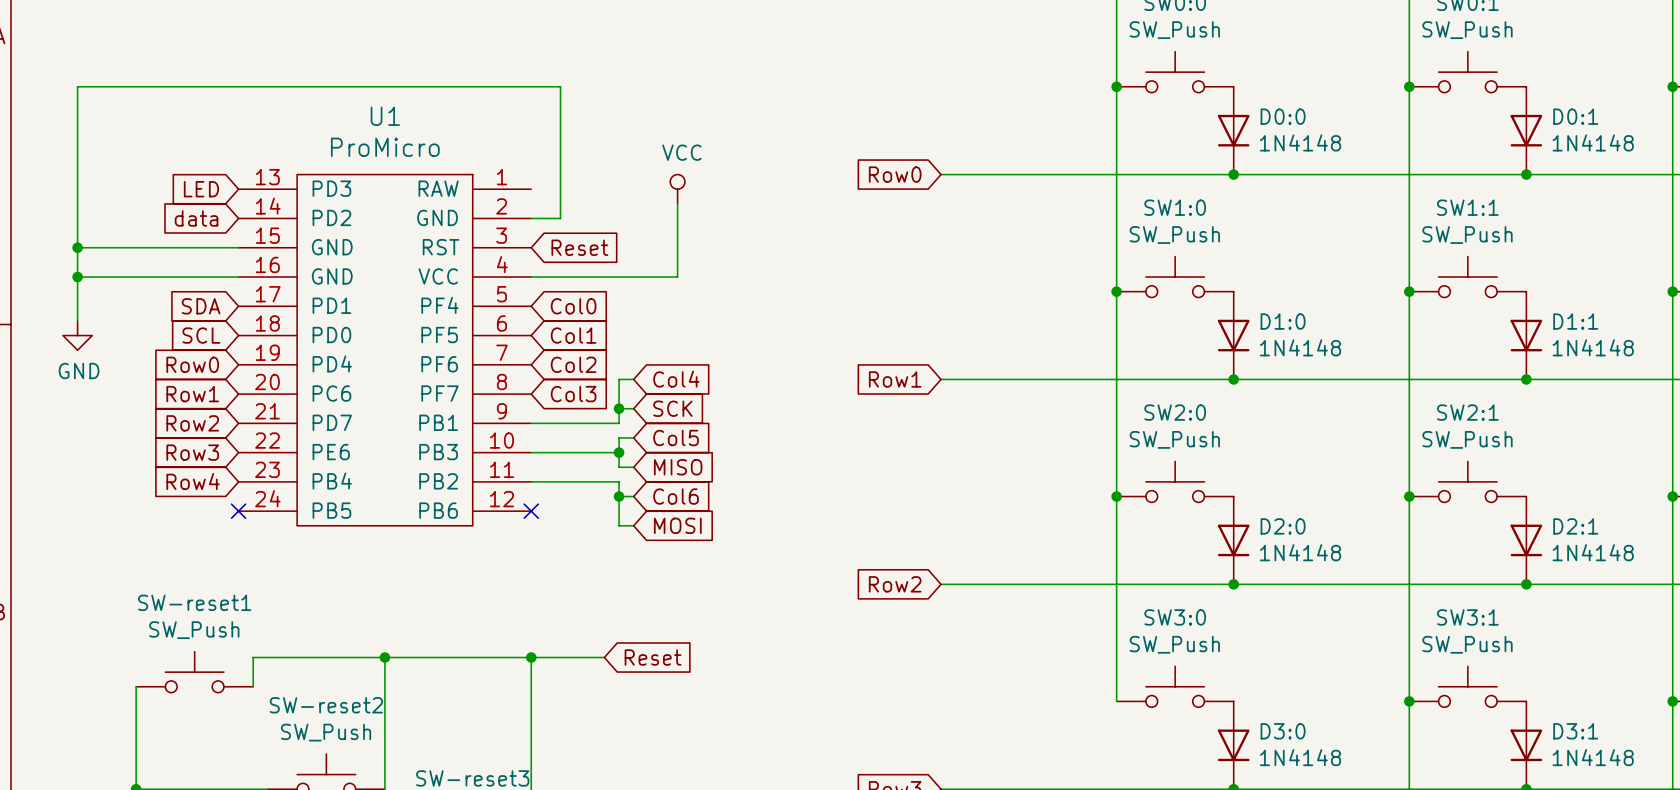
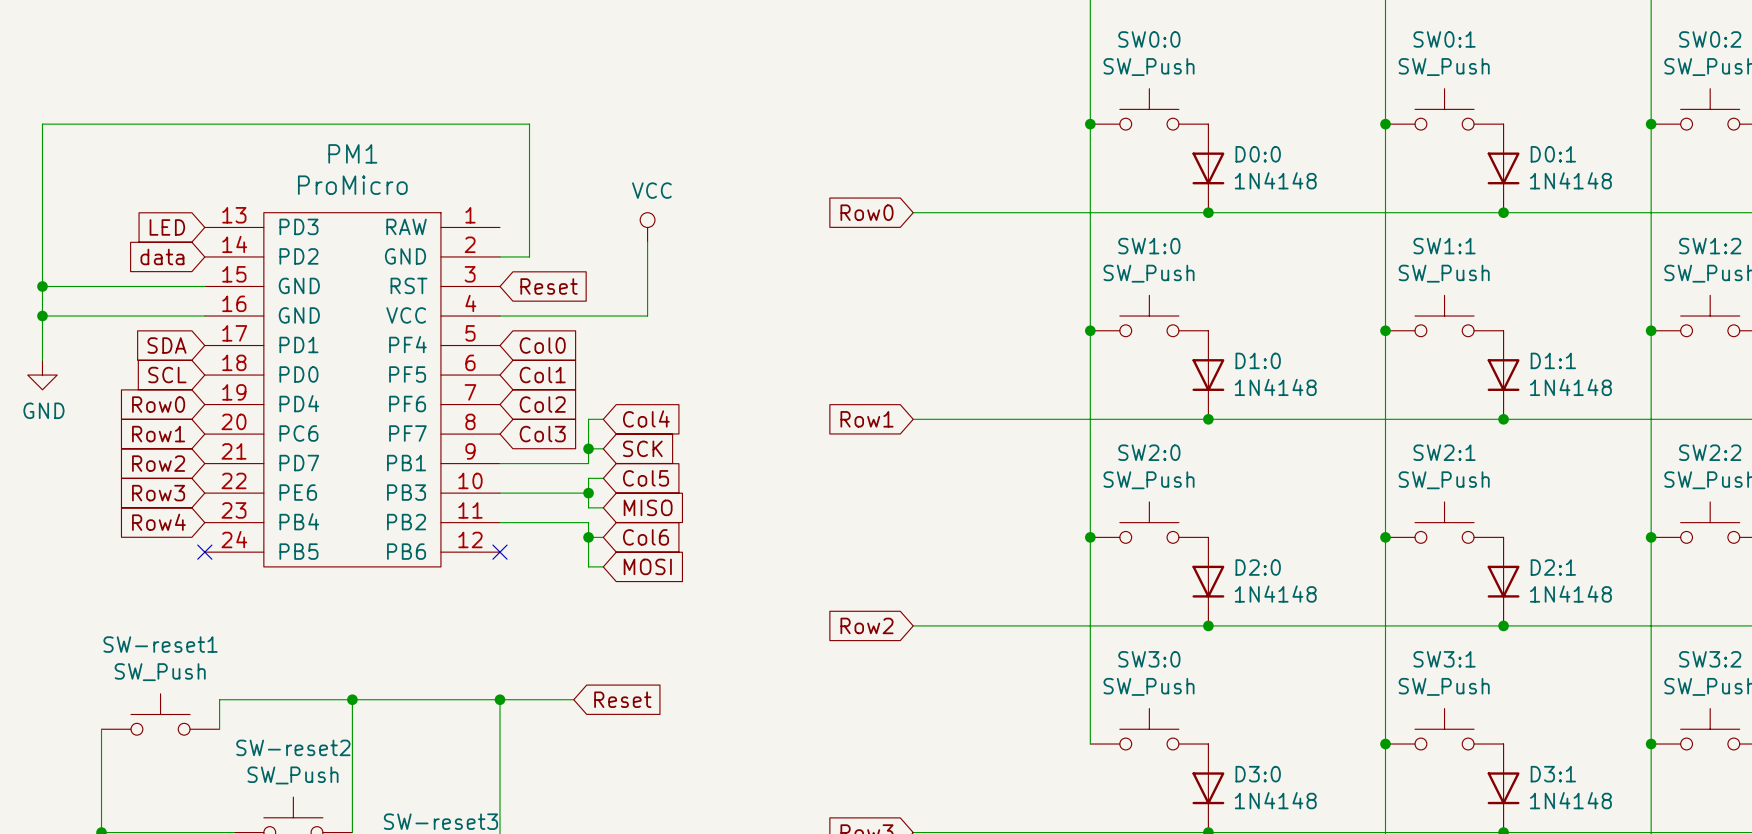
U1 name: U1 (385, 116) -> PM1 (352, 153)

